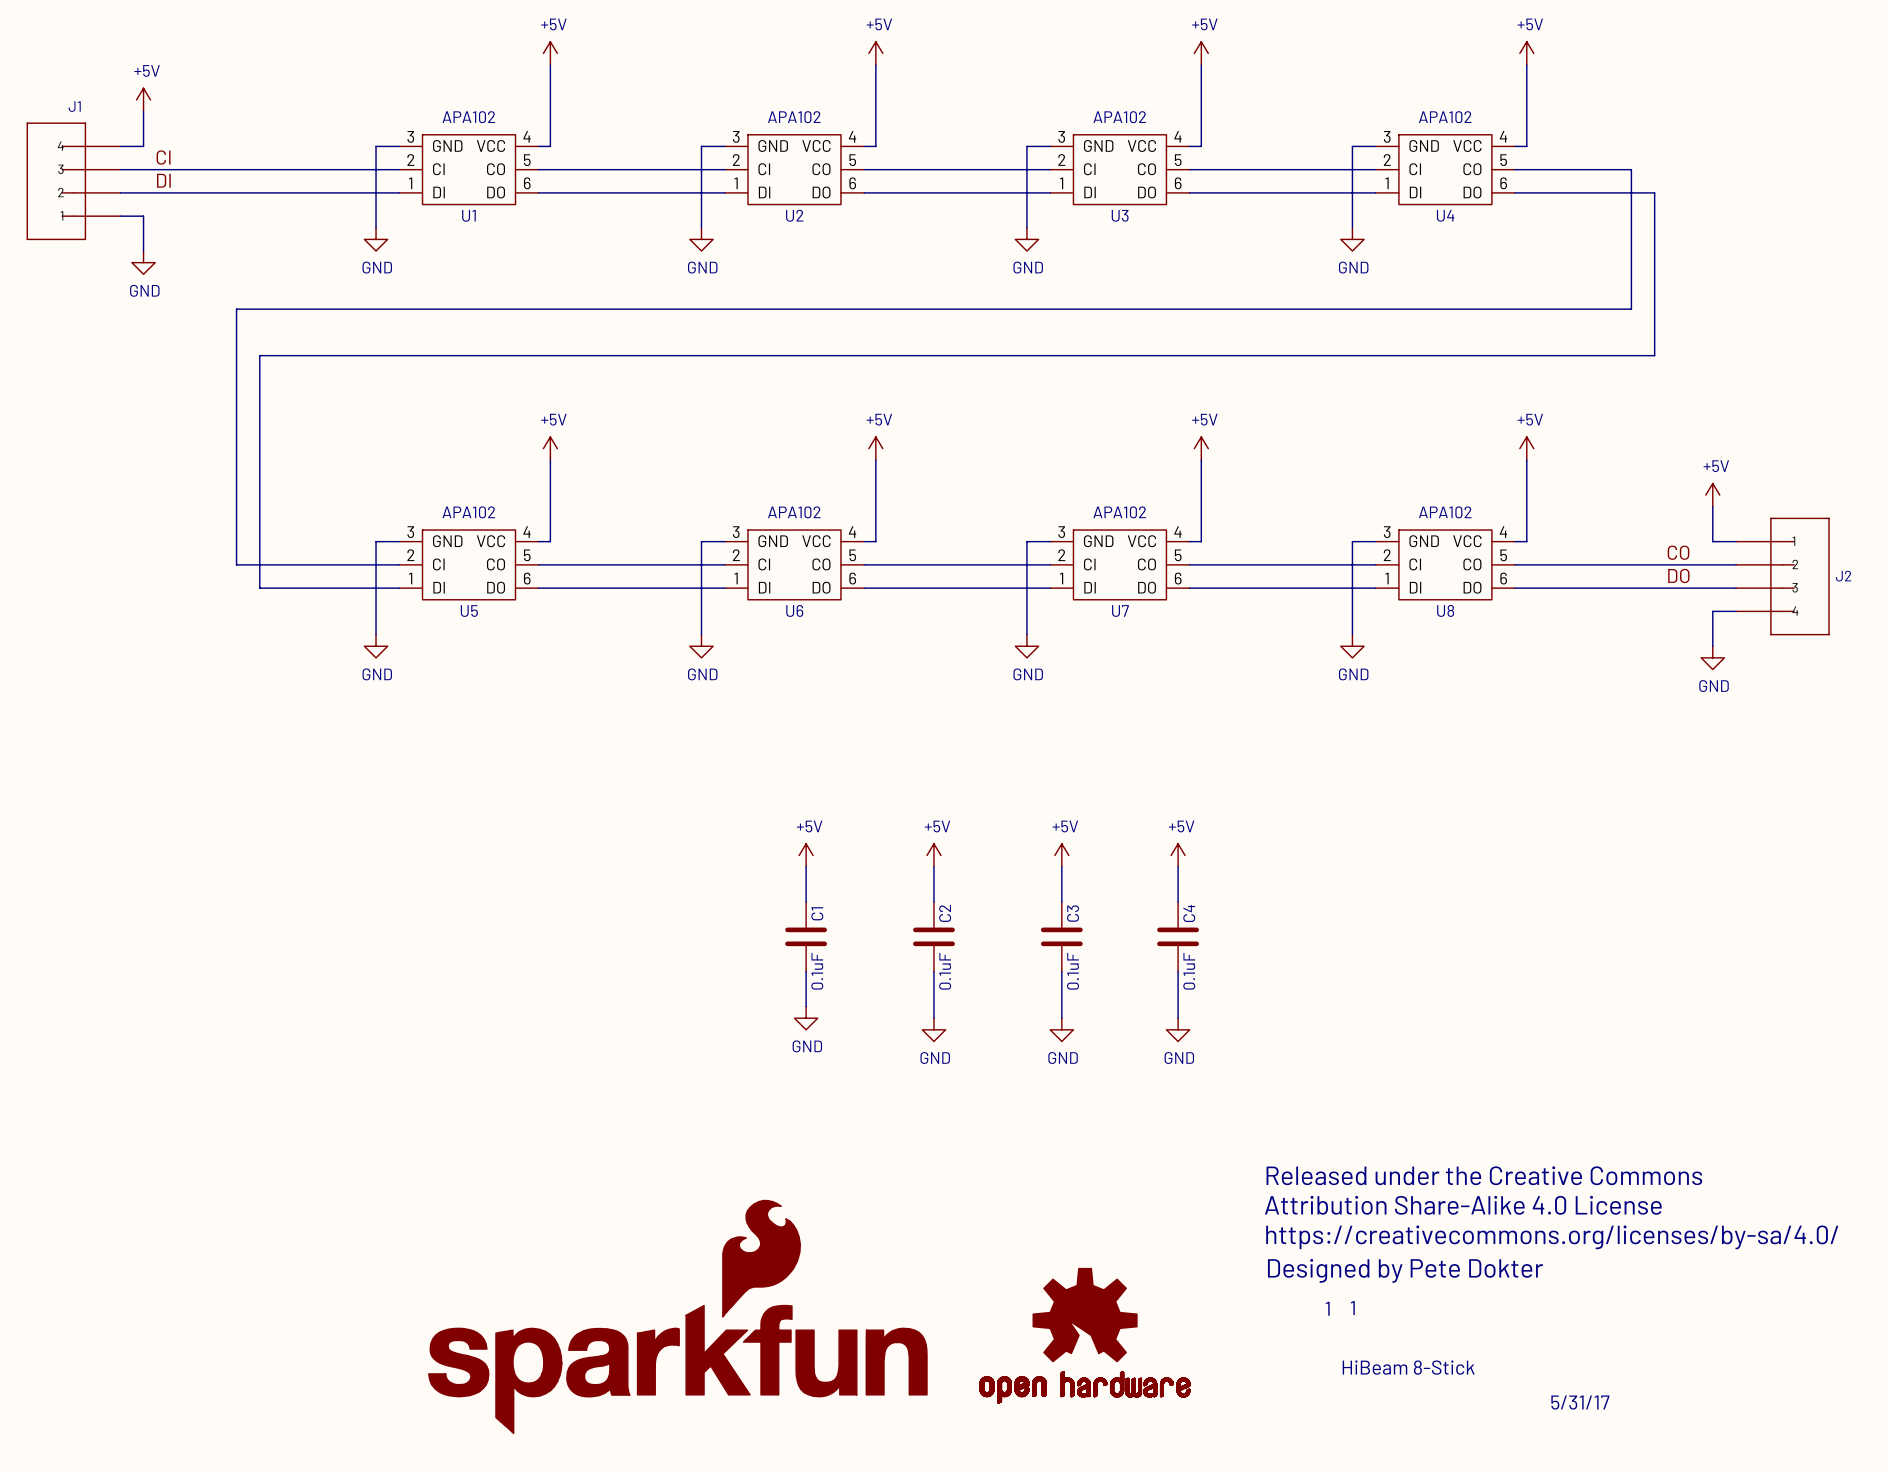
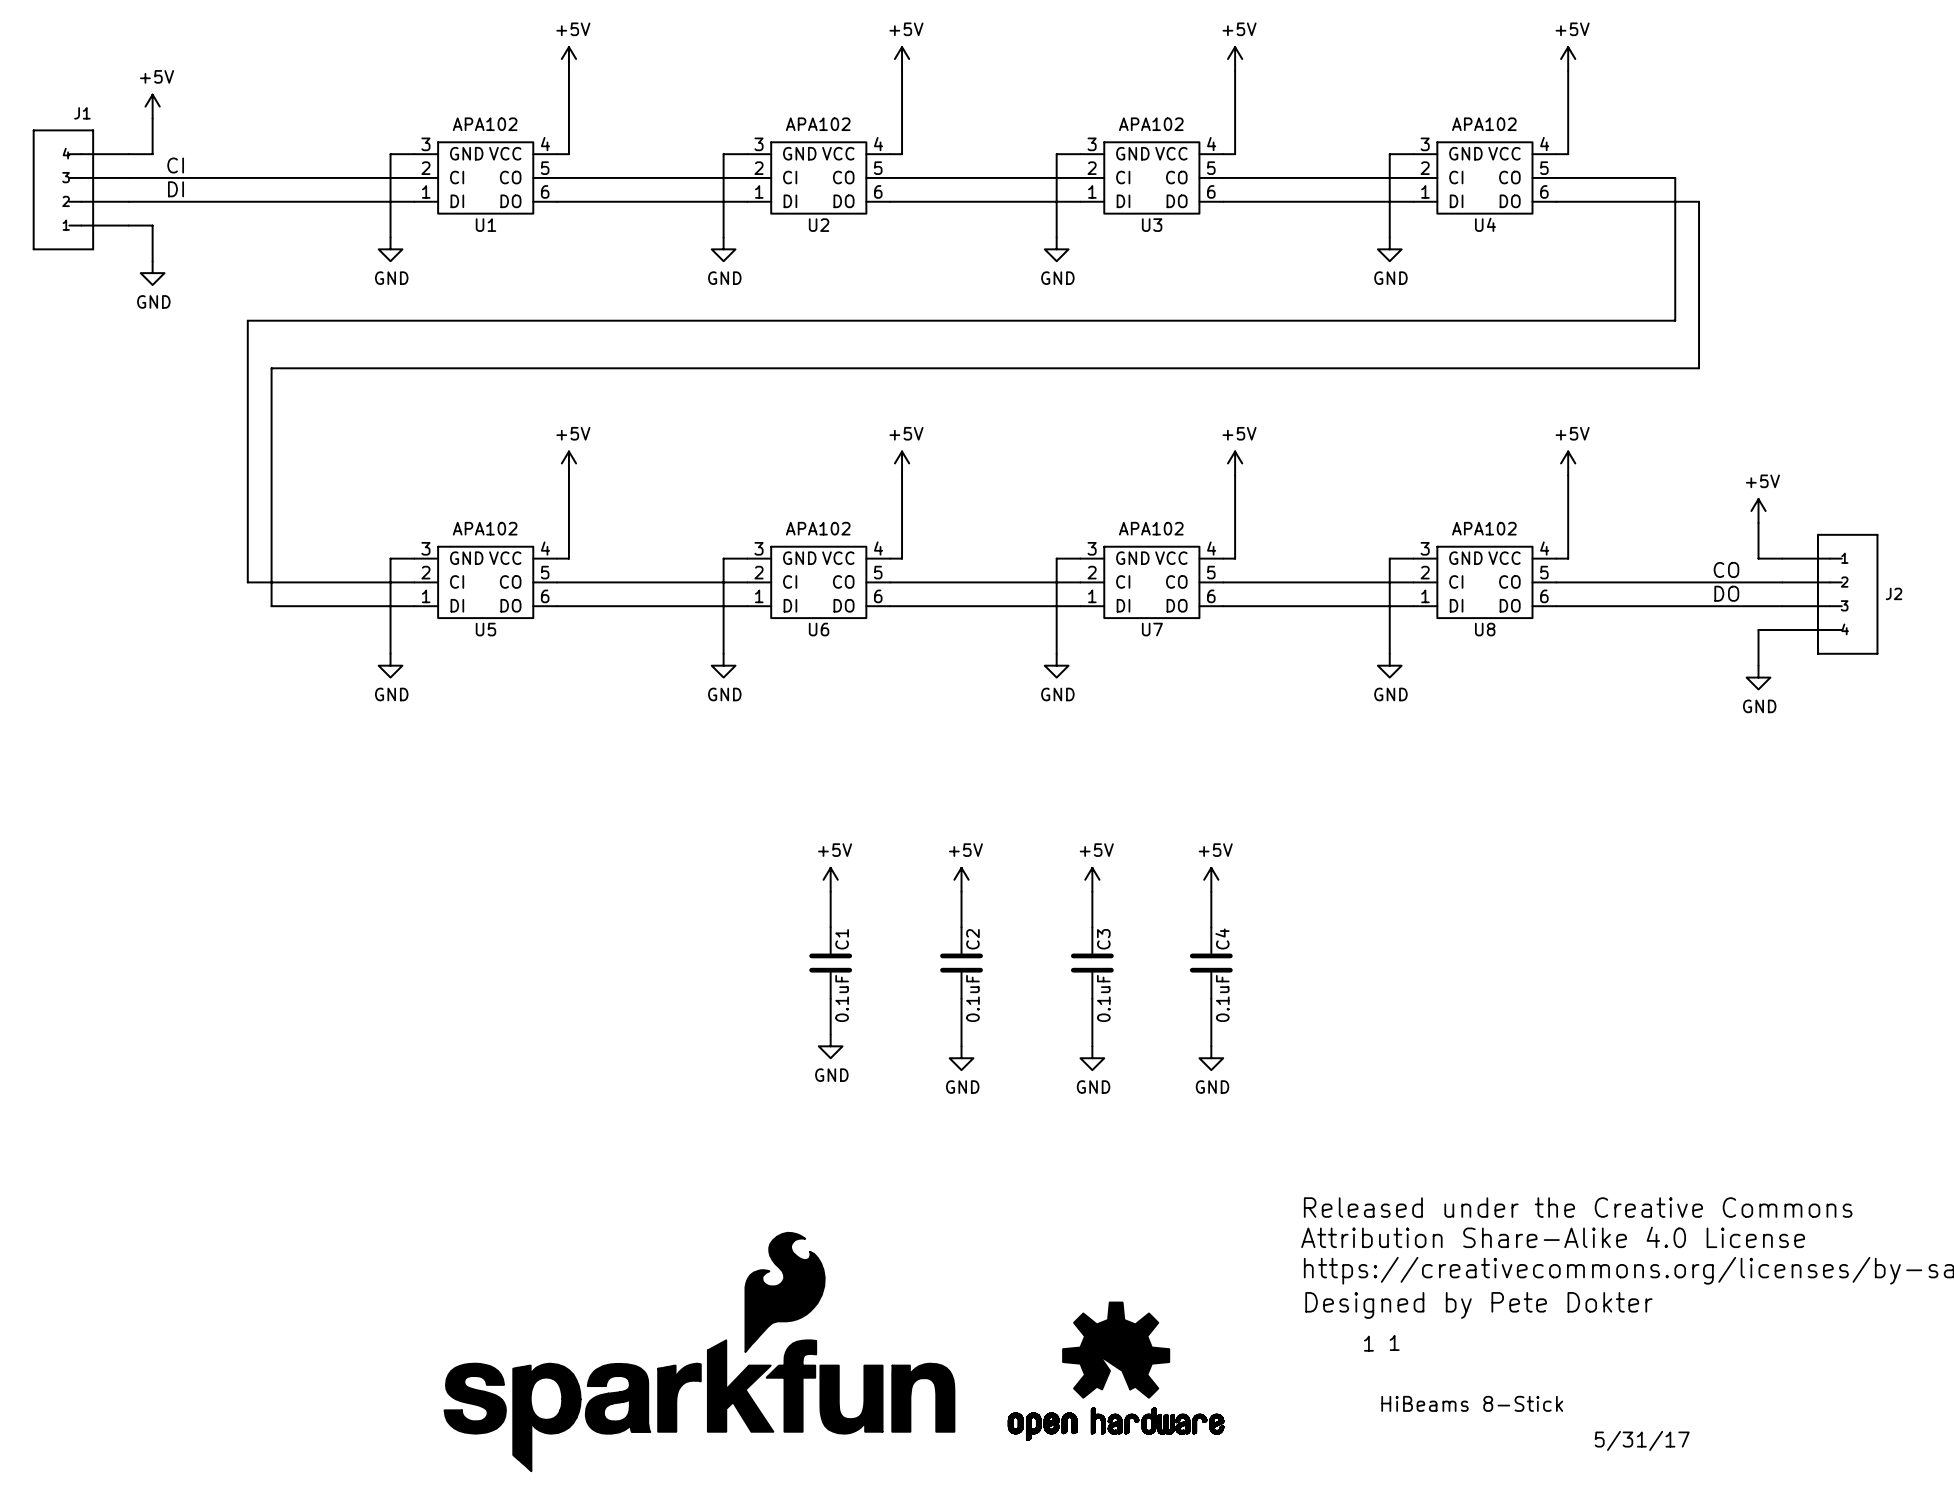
text: HiBeam 8-Stick (1408, 1367) -> HiBeams 8-Stick (1472, 1403)

